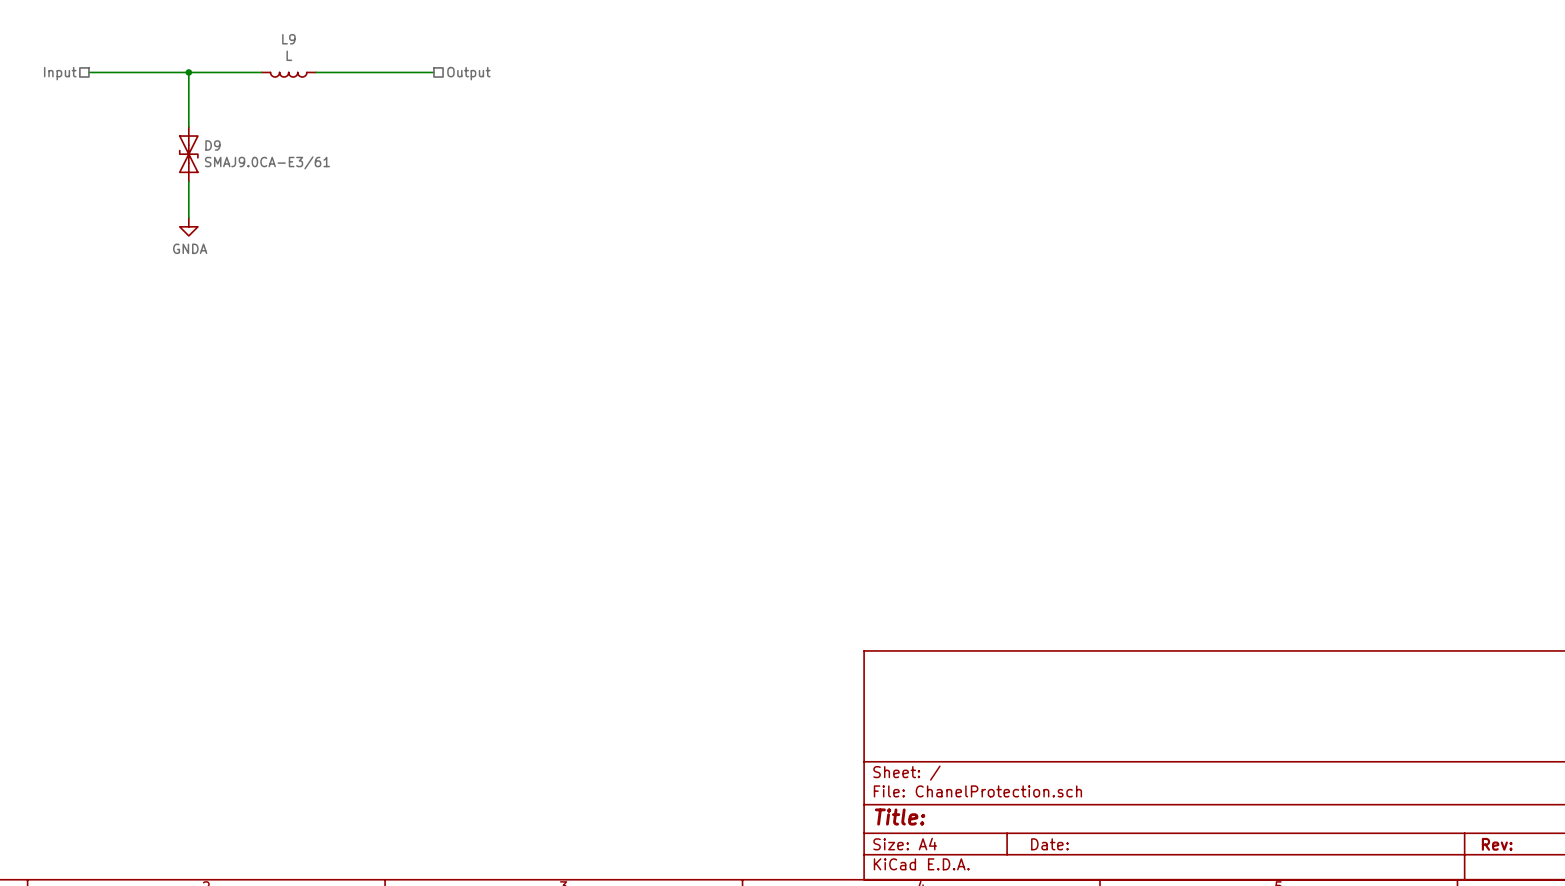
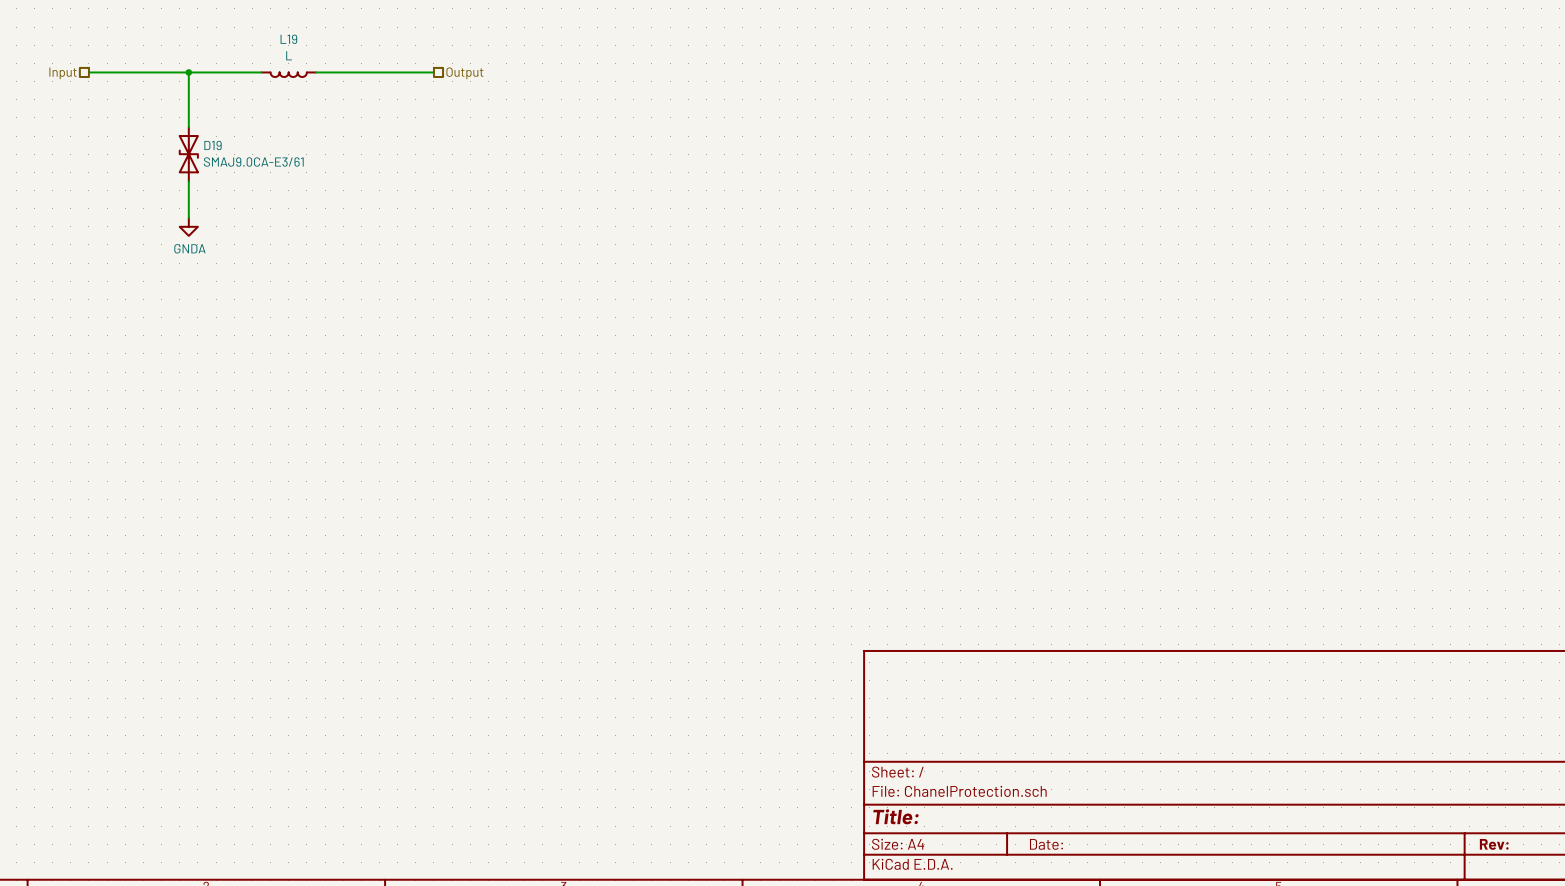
L9 name: L9 (288, 39) -> L19 (288, 39)
D9 name: D9 (212, 145) -> D19 (213, 145)

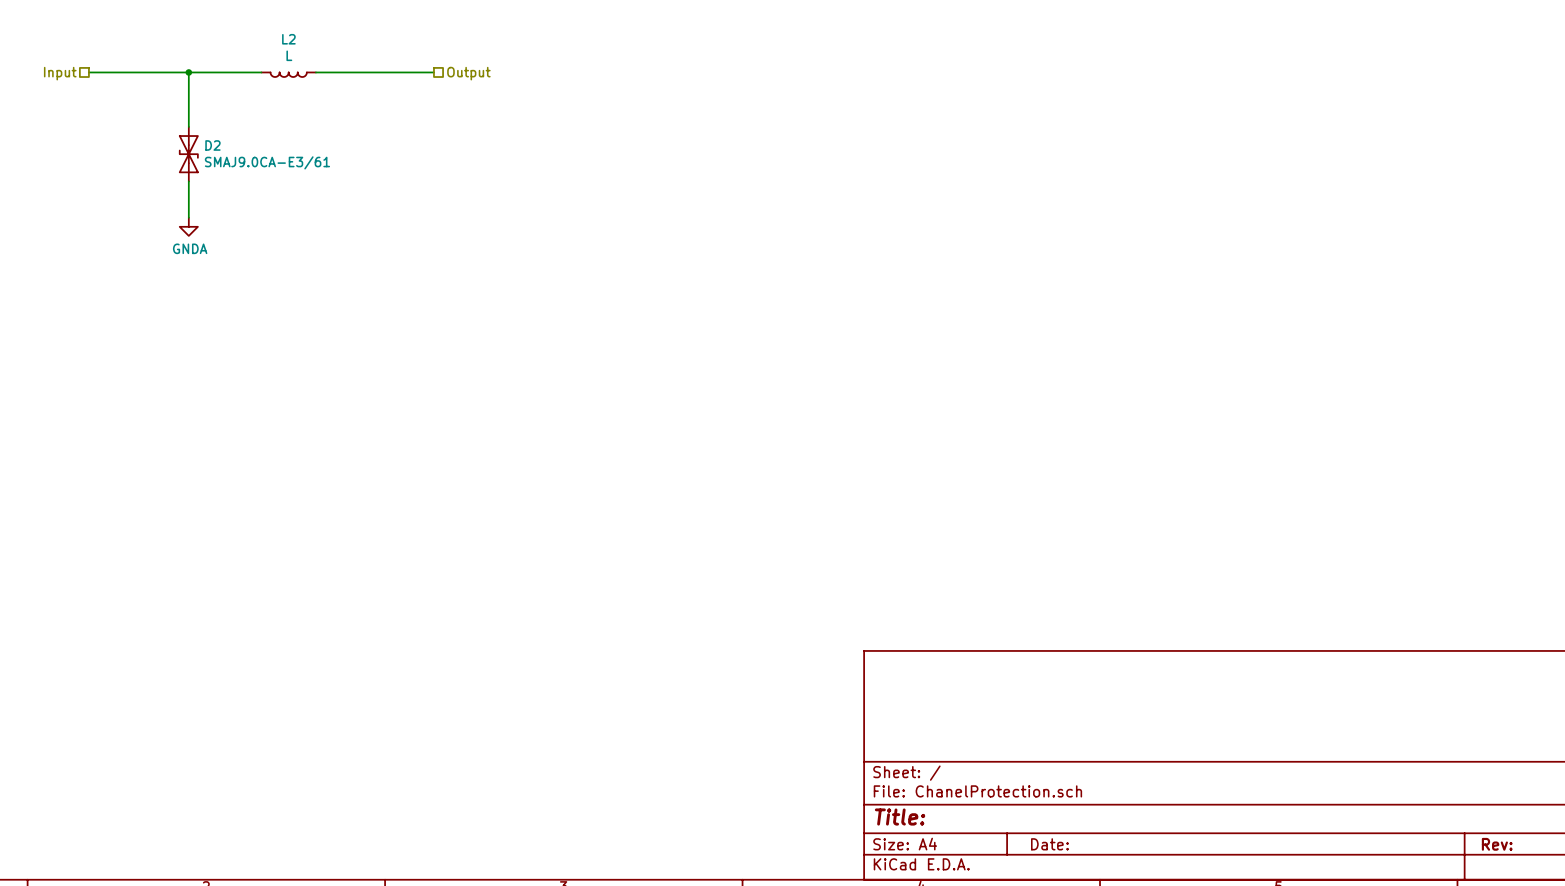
L19 name: L19 (288, 39) -> L2 (288, 39)
D19 name: D19 (213, 145) -> D2 (212, 145)

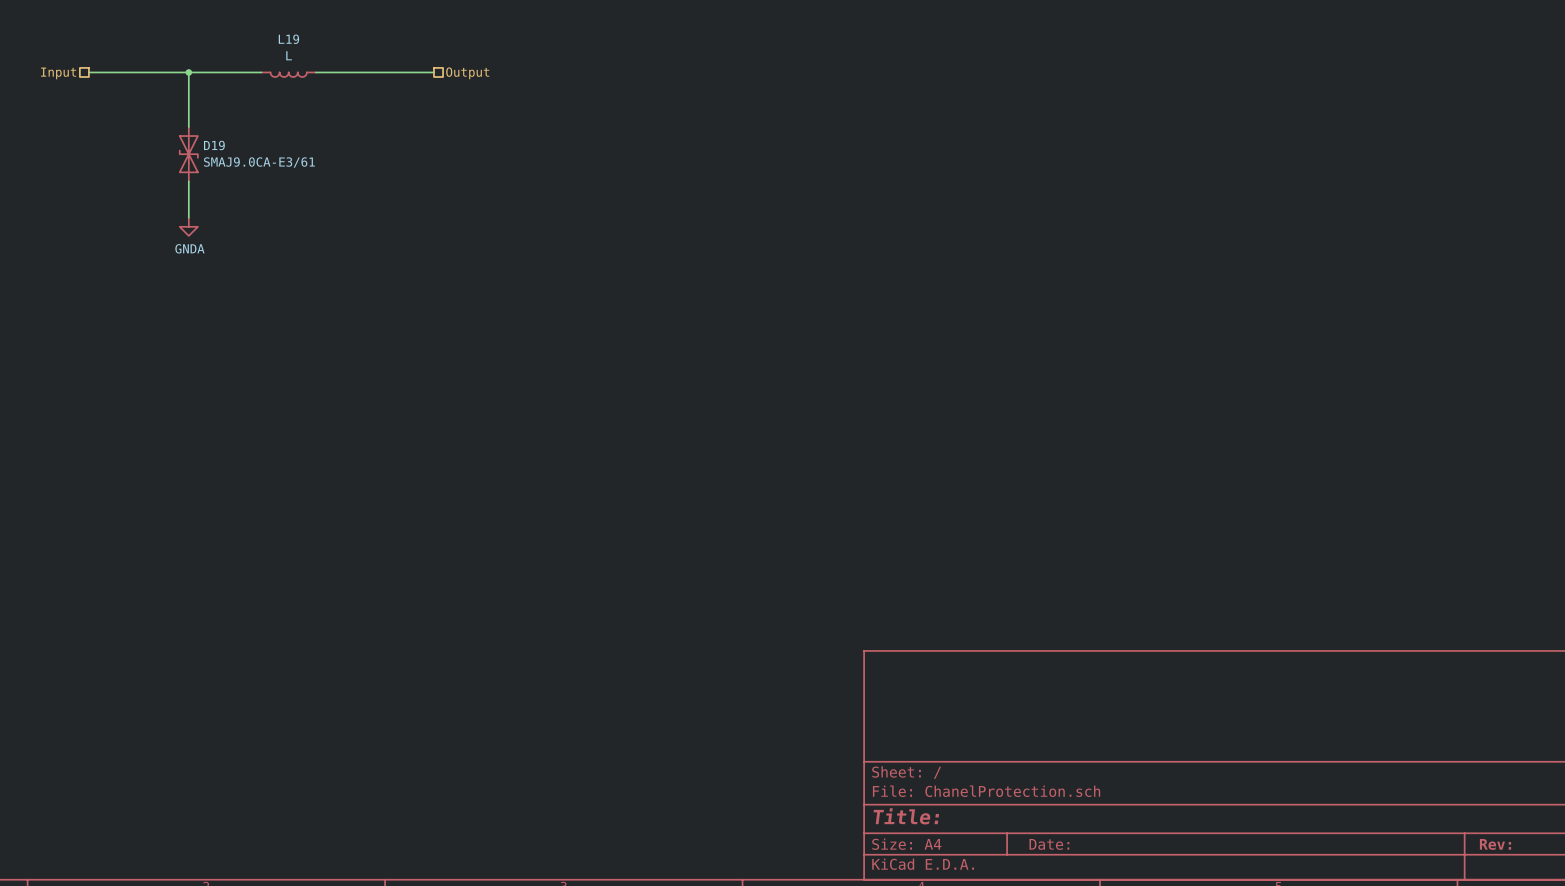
L2 name: L2 (288, 39) -> L19 (288, 39)
D2 name: D2 (212, 145) -> D19 (214, 145)

